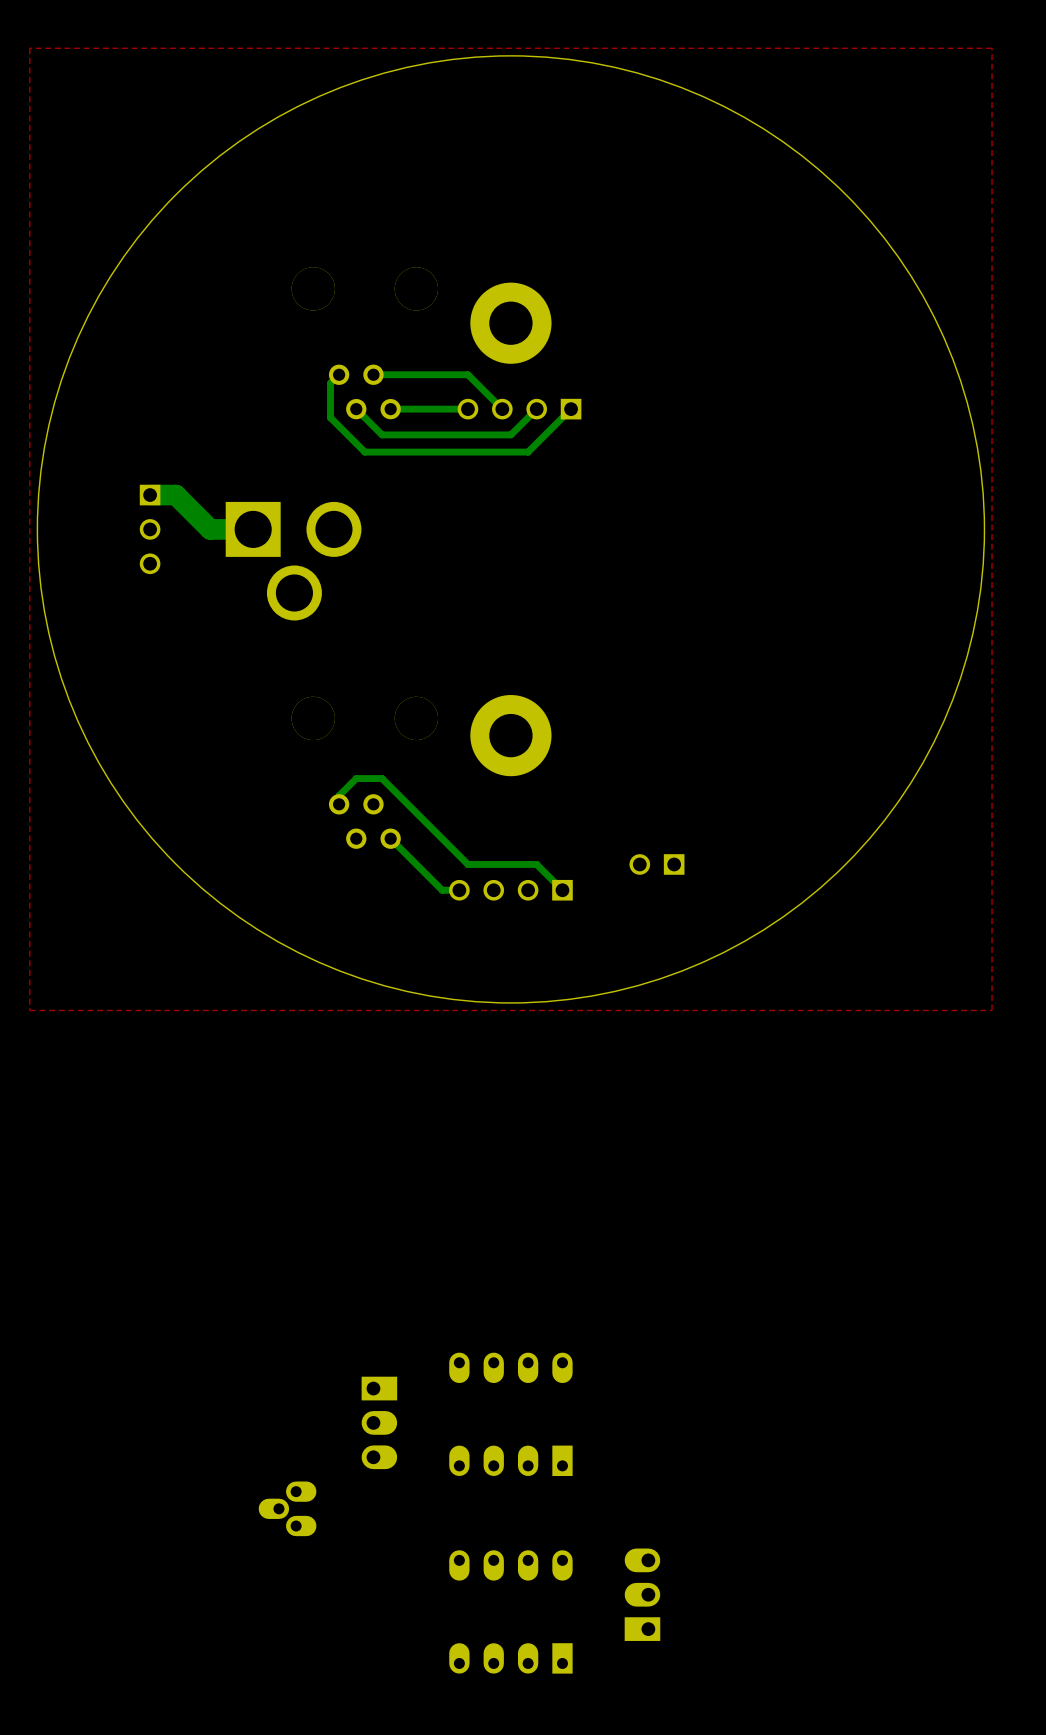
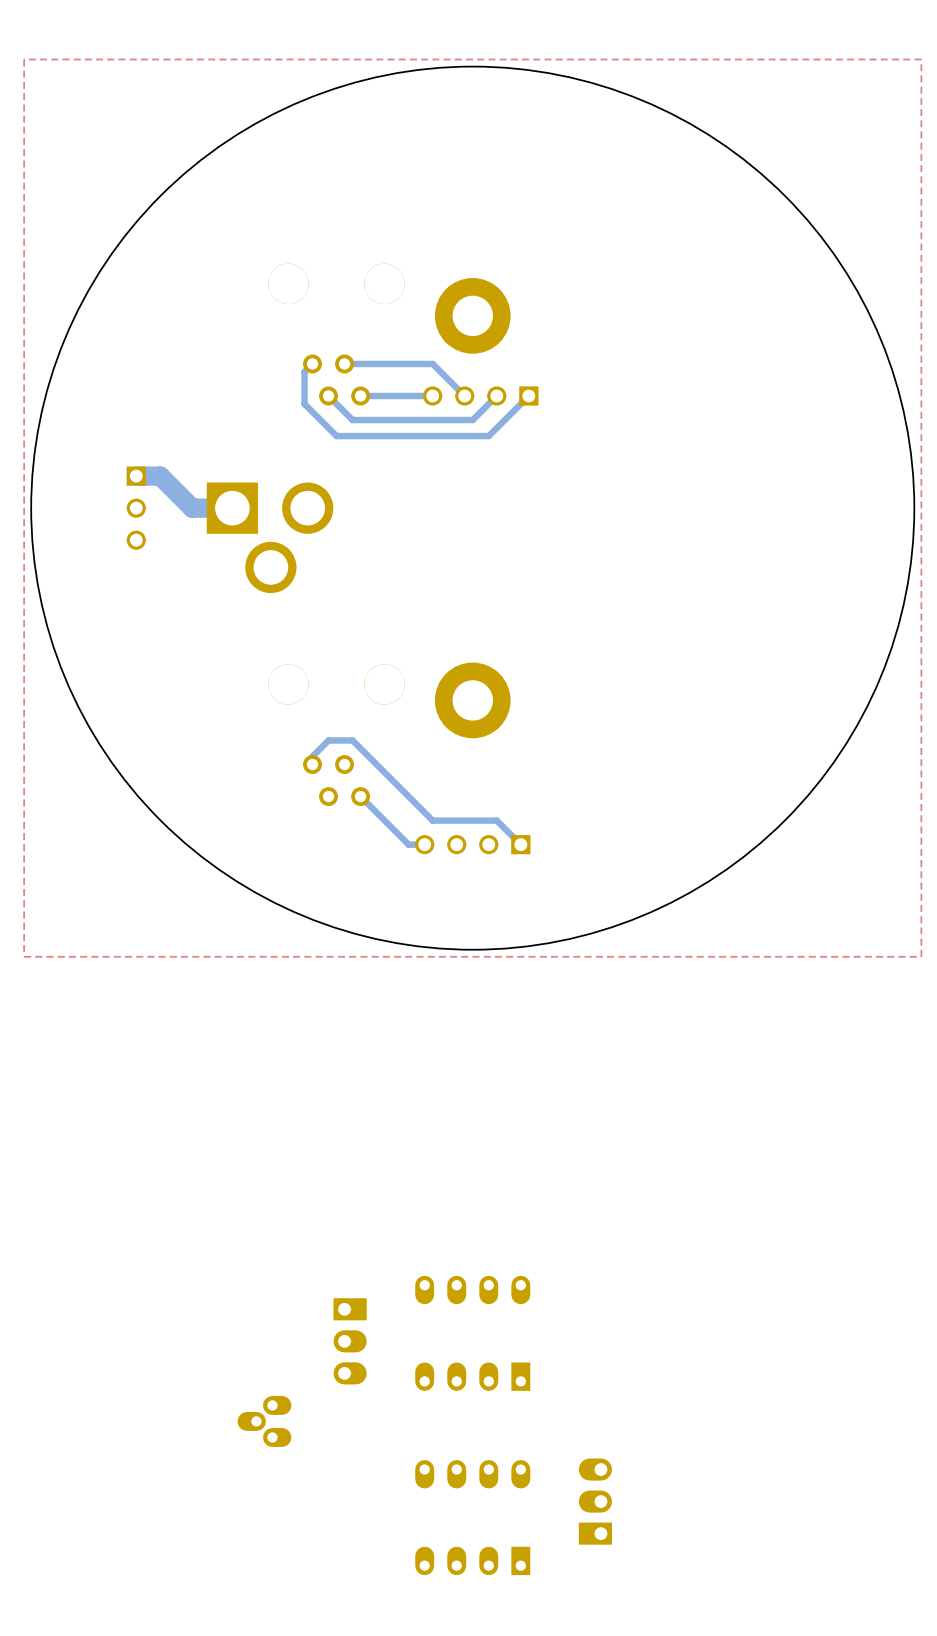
part: (656, 864) -> none

